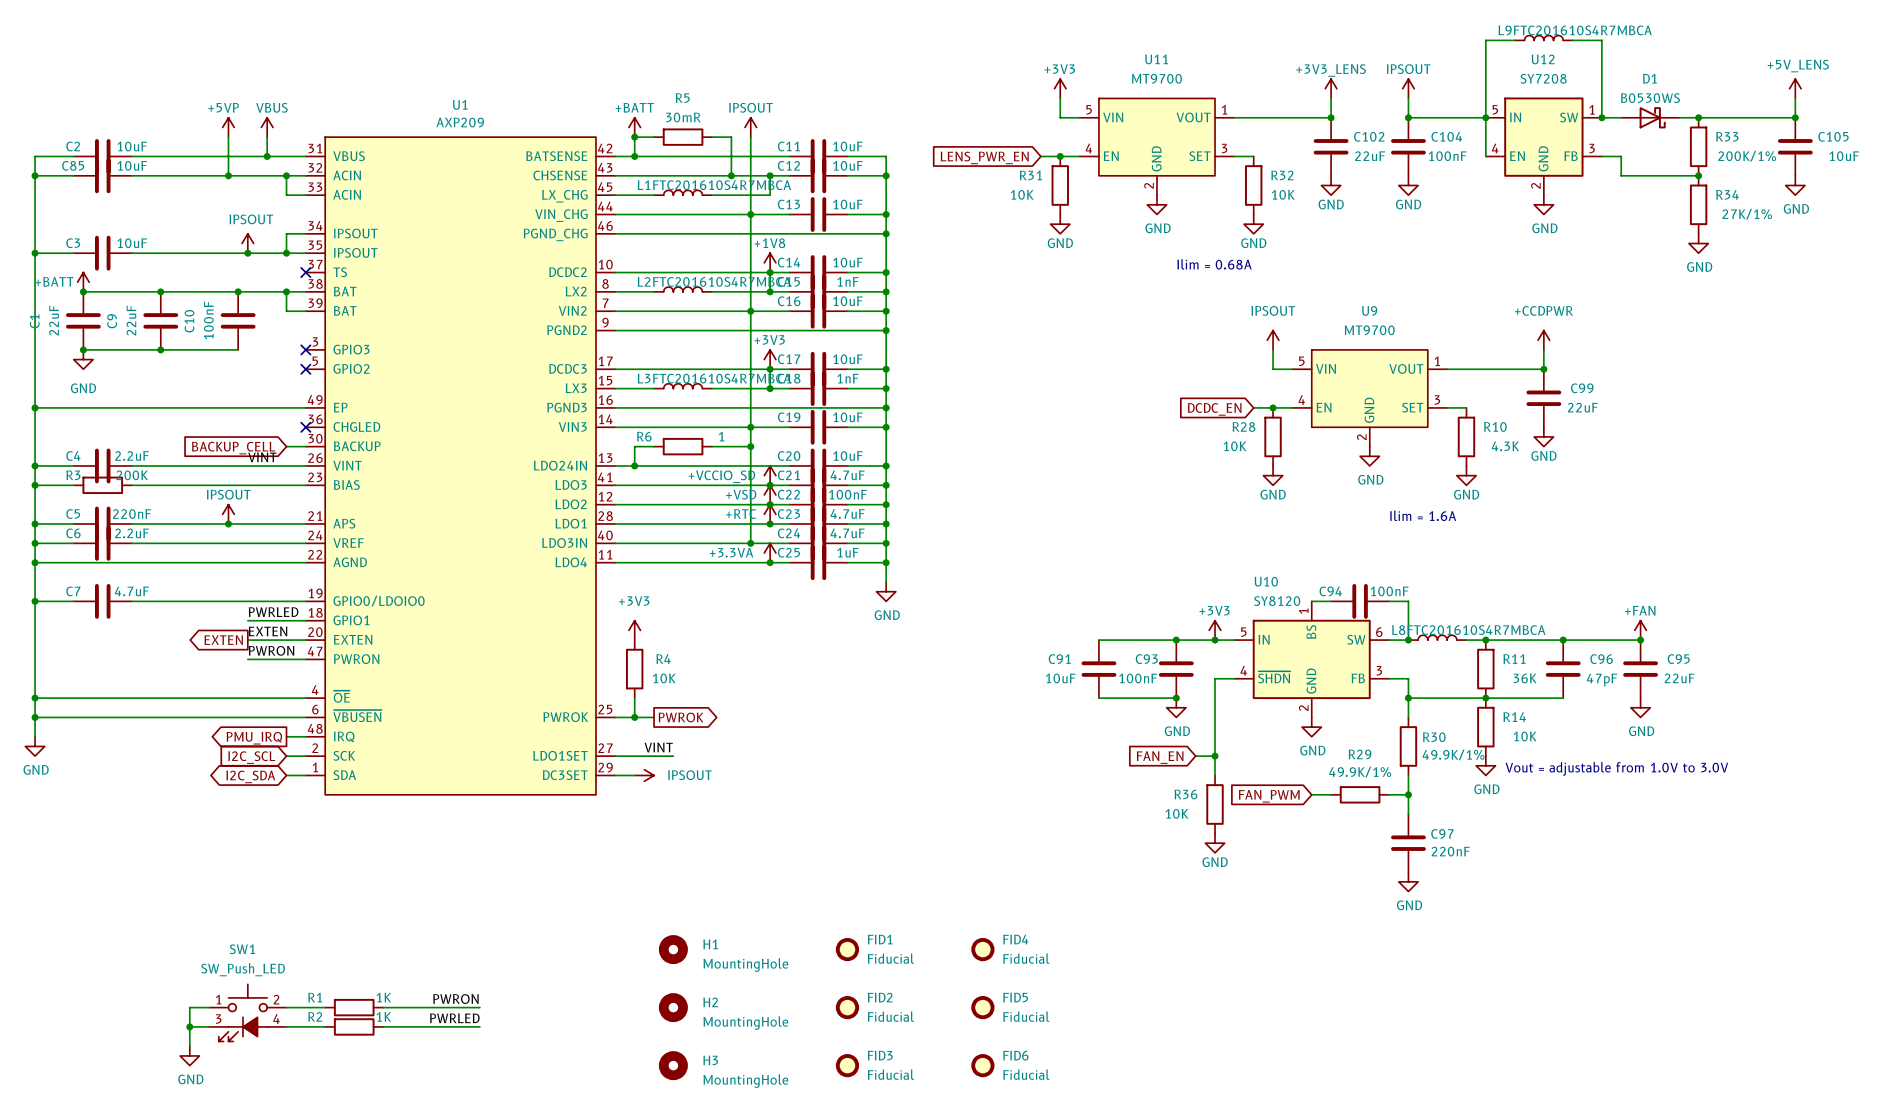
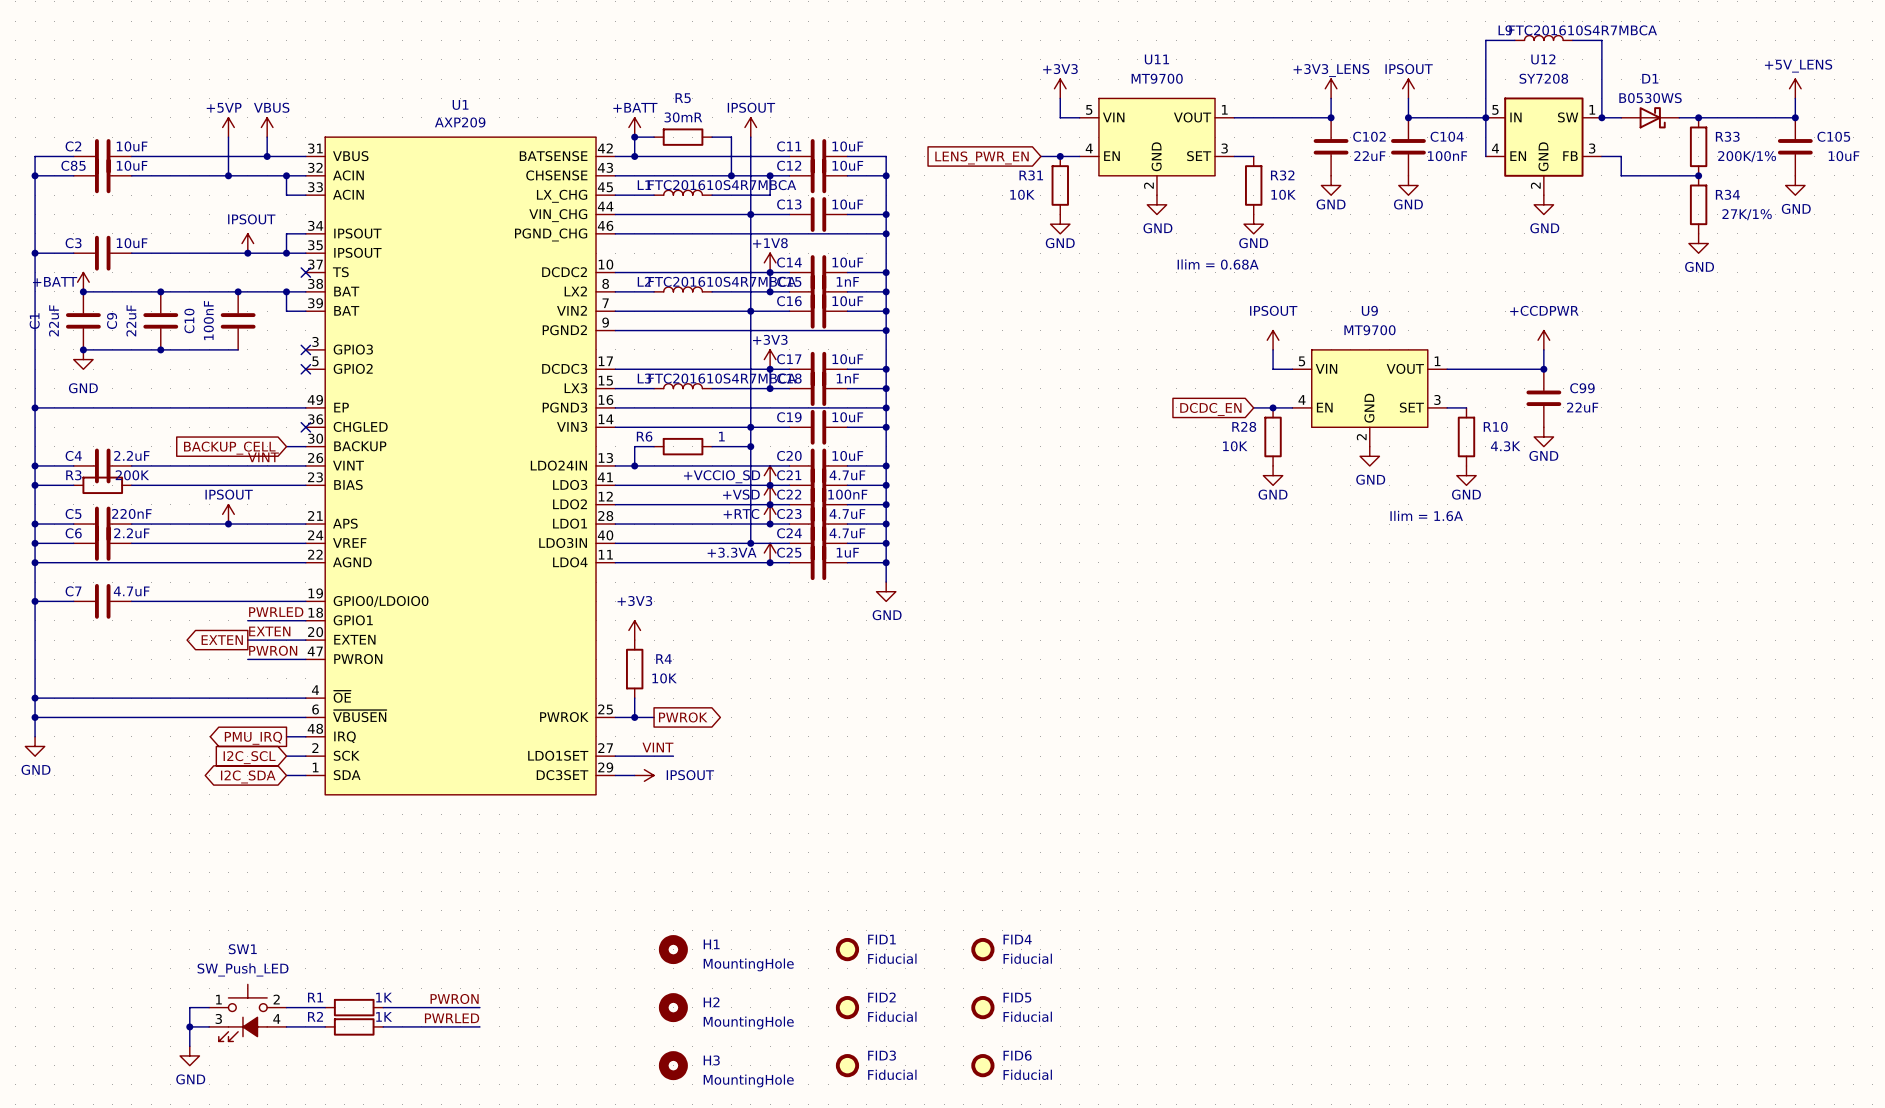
wire: (1311, 601) (1331, 601) -> none
C94: 100nF (1360, 601) -> none
wire: (1389, 601) (1408, 601) (1408, 640) (1389, 640) -> none
power symbol: +3V3 (1215, 630) -> none
power symbol: +FAN (1640, 630) -> none
L8: FTC201610S4R7MBCA (1437, 637) -> none
wire: (1098, 640) (1234, 640) -> none
junction: (1176, 640) -> none
junction: (1215, 640) -> none
junction: (1408, 640) -> none
wire: (1466, 640) (1640, 640) -> none
junction: (1485, 640) -> none
junction: (1563, 640) -> none
junction: (1640, 640) -> none
U10: SY8120 (1311, 659) -> none
C91: 10uF (1098, 669) -> none
C93: 100nF (1176, 669) -> none
R11: 36K (1485, 669) -> none
C96: 47pF (1563, 669) -> none
C95: 22uF (1640, 669) -> none
wire: (1234, 678) (1215, 678) (1215, 775) -> none
wire: (1389, 678) (1408, 678) (1408, 717) -> none
wire: (1098, 698) (1176, 698) -> none
junction: (1176, 698) -> none
wire: (1408, 698) (1563, 698) -> none
junction: (1408, 698) -> none
junction: (1485, 698) -> none
power symbol: GND (1176, 707) -> none
power symbol: GND (1640, 707) -> none
power symbol: GND (1311, 727) -> none
R14: 10K (1485, 727) -> none
R30: 49.9K/1% (1408, 746) -> none
wire: (1195, 756) (1215, 756) -> none
junction: (1215, 756) -> none
global label: FAN_EN (1160, 757) -> none
power symbol: GND (1485, 765) -> none
text: Vout = adjustable from 1.0V to 3.0V (1616, 768) -> none
wire: (1408, 775) (1408, 814) -> none
wire: (1311, 794) (1331, 794) -> none
R29: 49.9K/1% (1360, 794) -> none
wire: (1389, 794) (1408, 794) -> none
junction: (1408, 794) -> none
global label: FAN_PWM (1269, 796) -> none
R36: 10K (1215, 804) -> none
power symbol: GND (1215, 843) -> none
C97: 220nF (1408, 843) -> none
power symbol: GND (1408, 881) -> none

